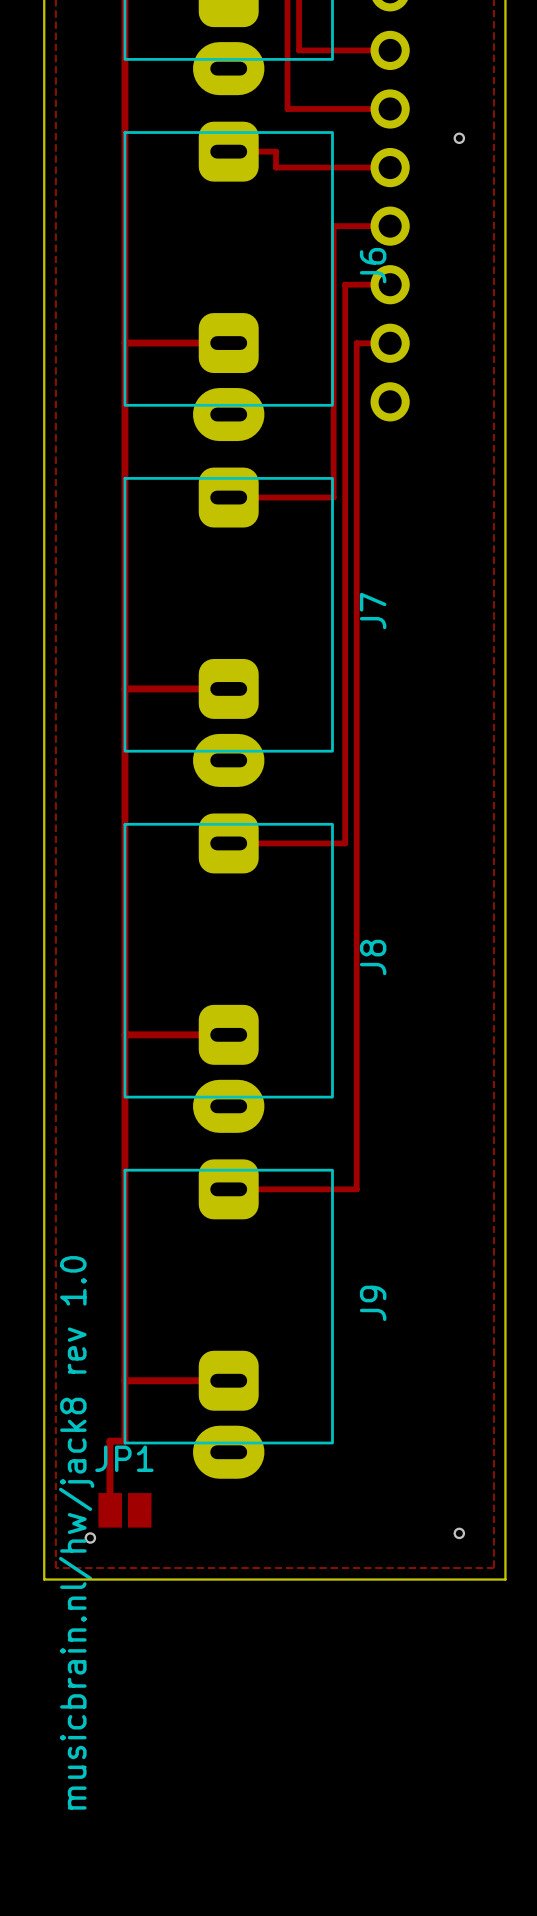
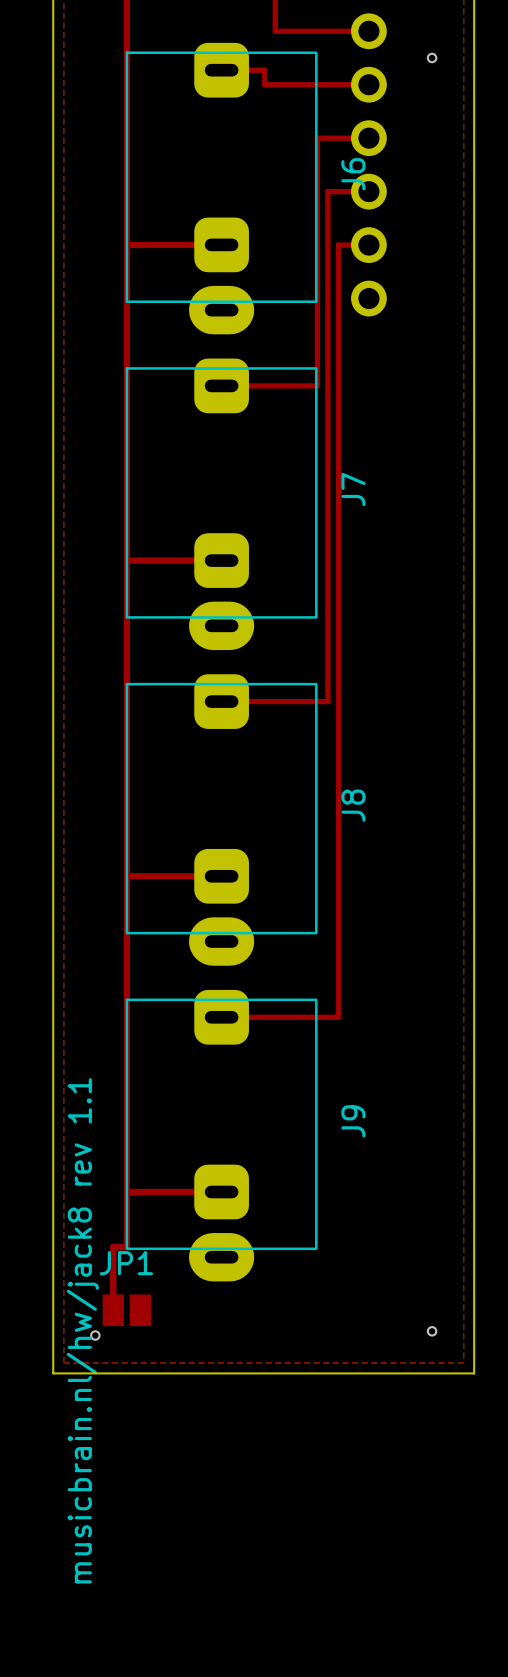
text: musicbrain.nl/hw/jack8 rev 1.0 (76, 1532) -> musicbrain.nl/hw/jack8 rev 1.1 (82, 1330)

